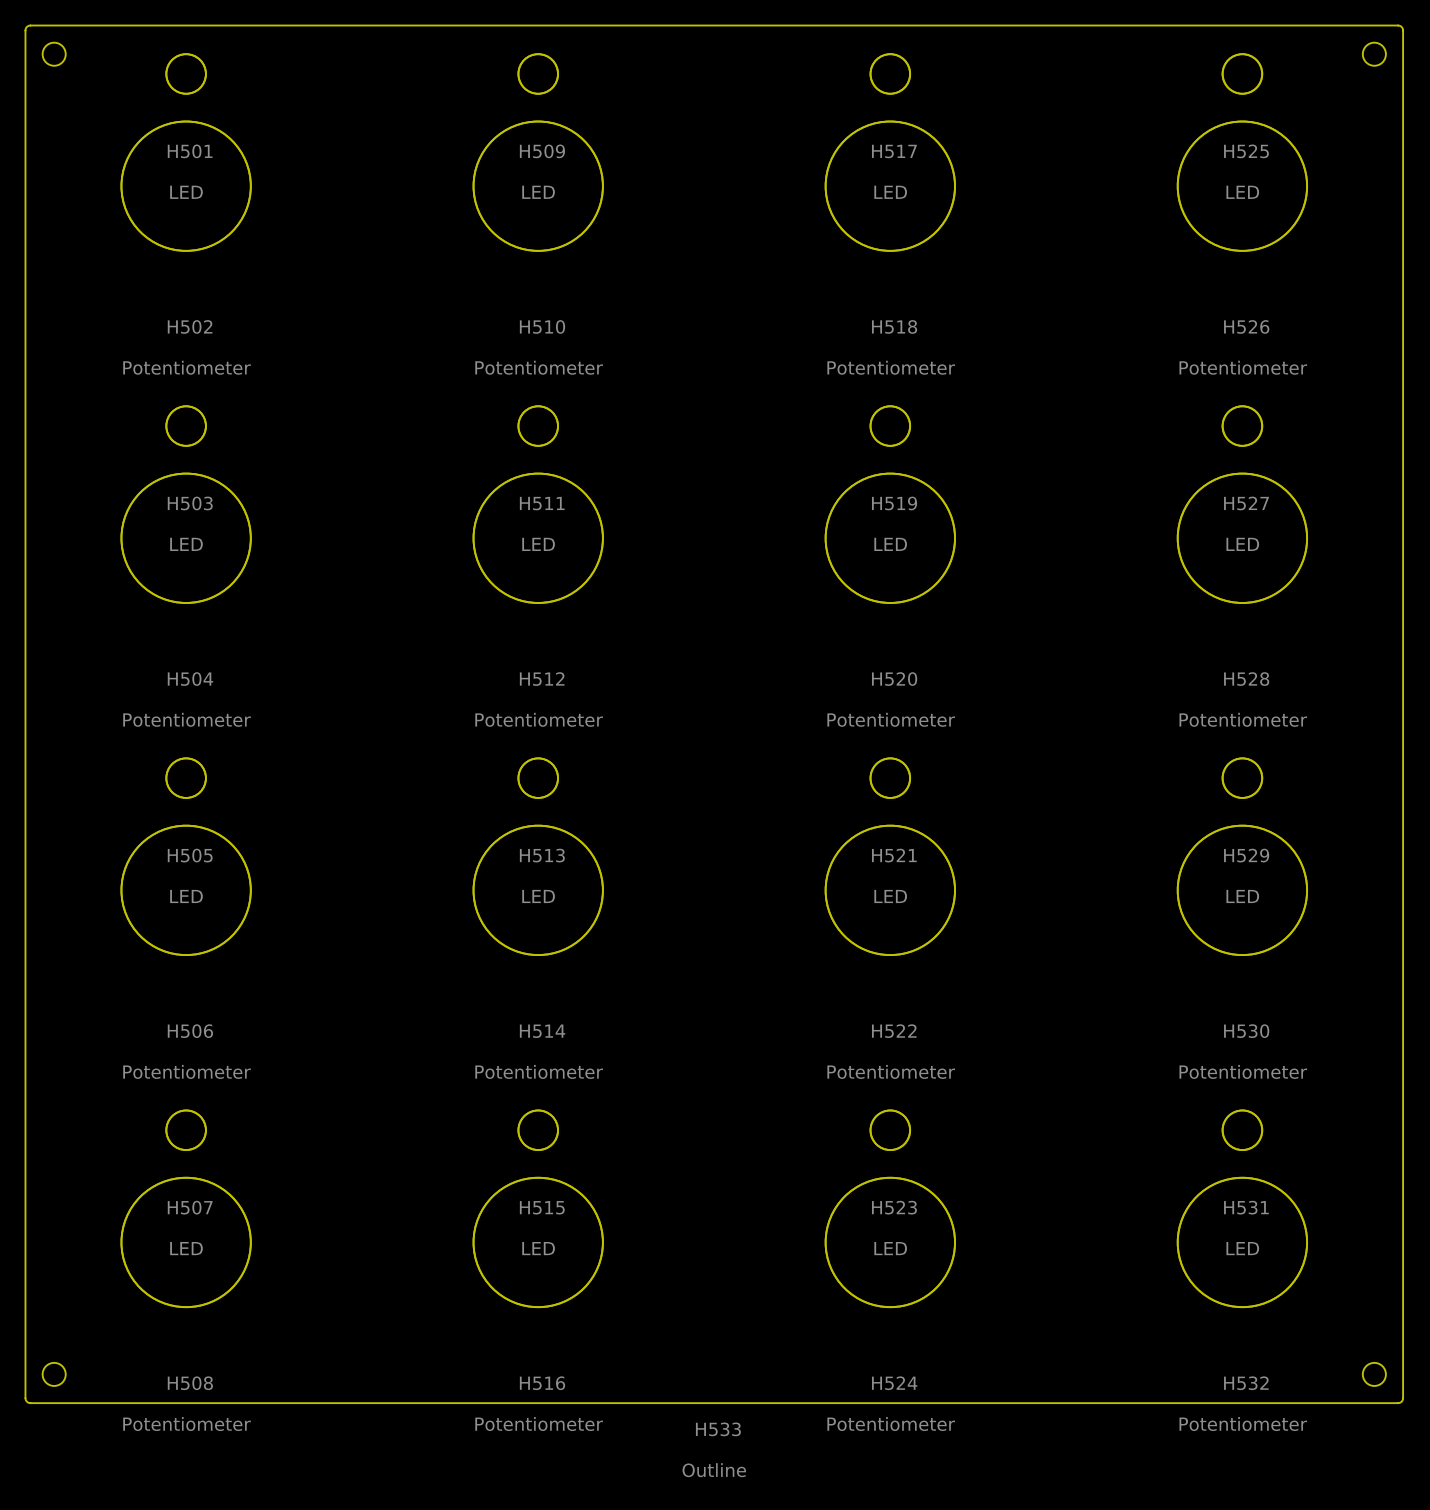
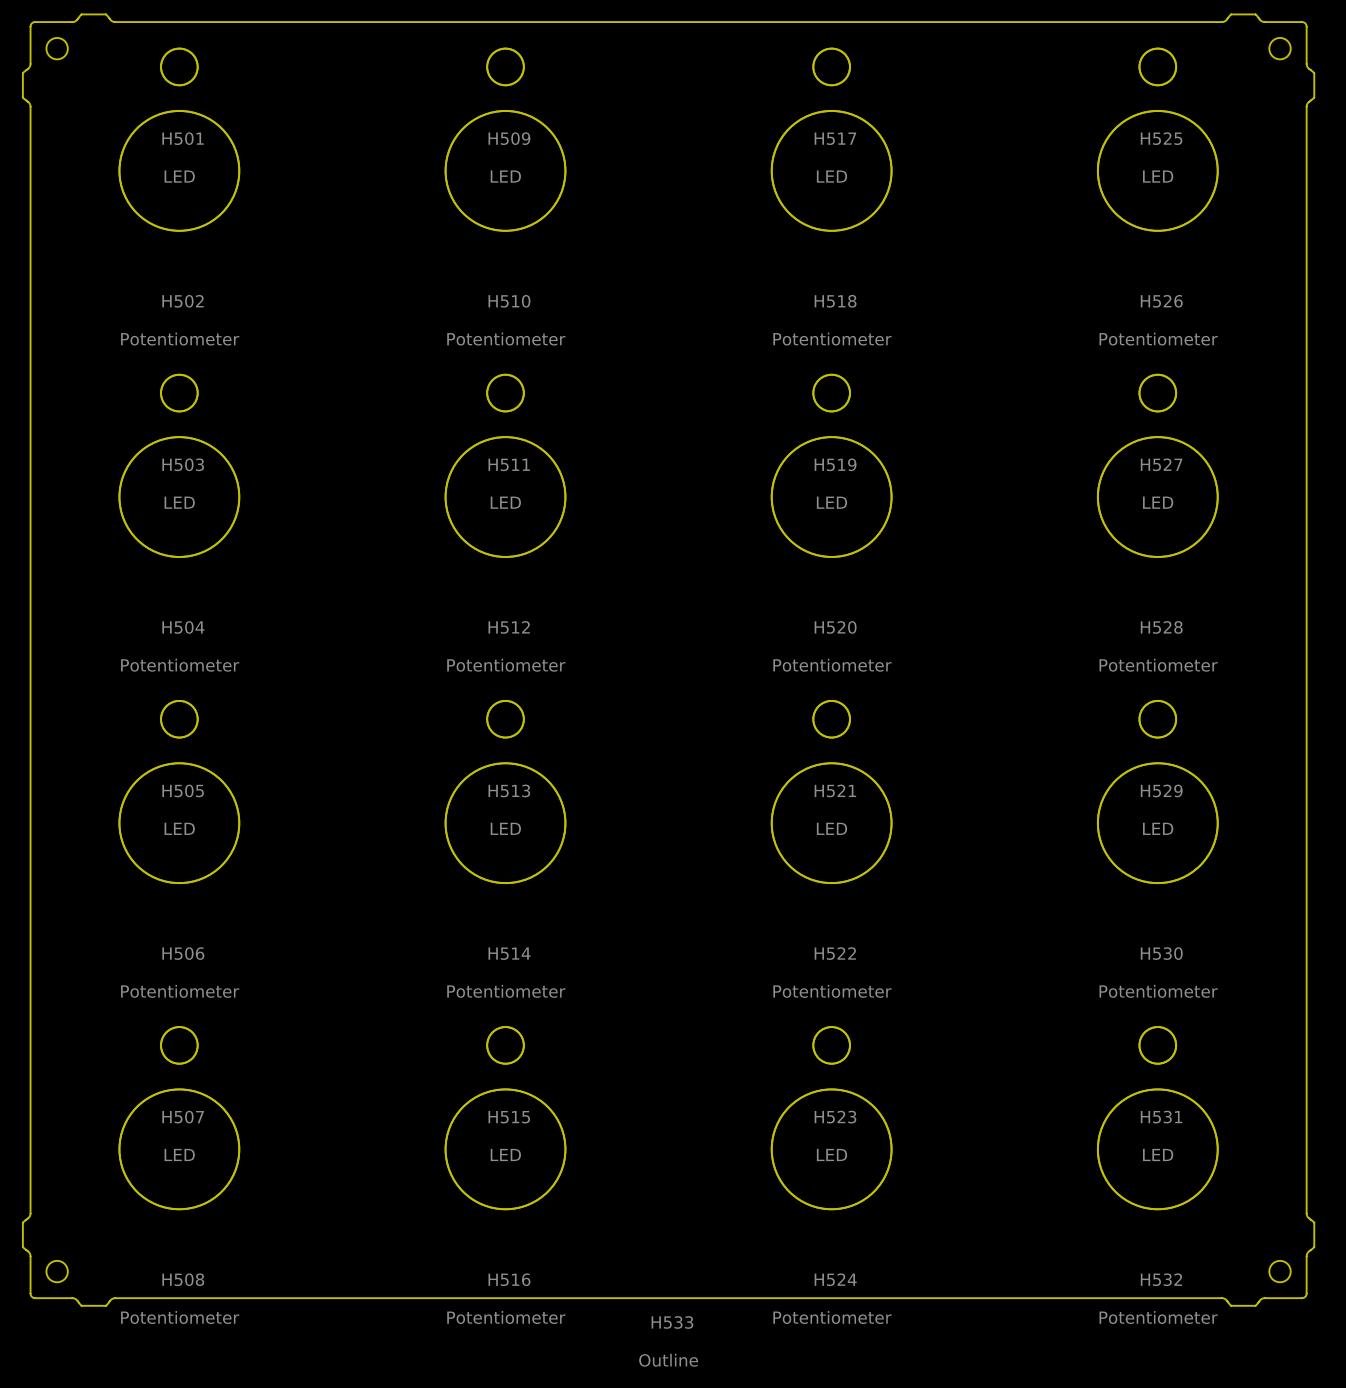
H533 footprint: [25, 25, 1404, 1404] -> [22, 14, 1315, 1307]

